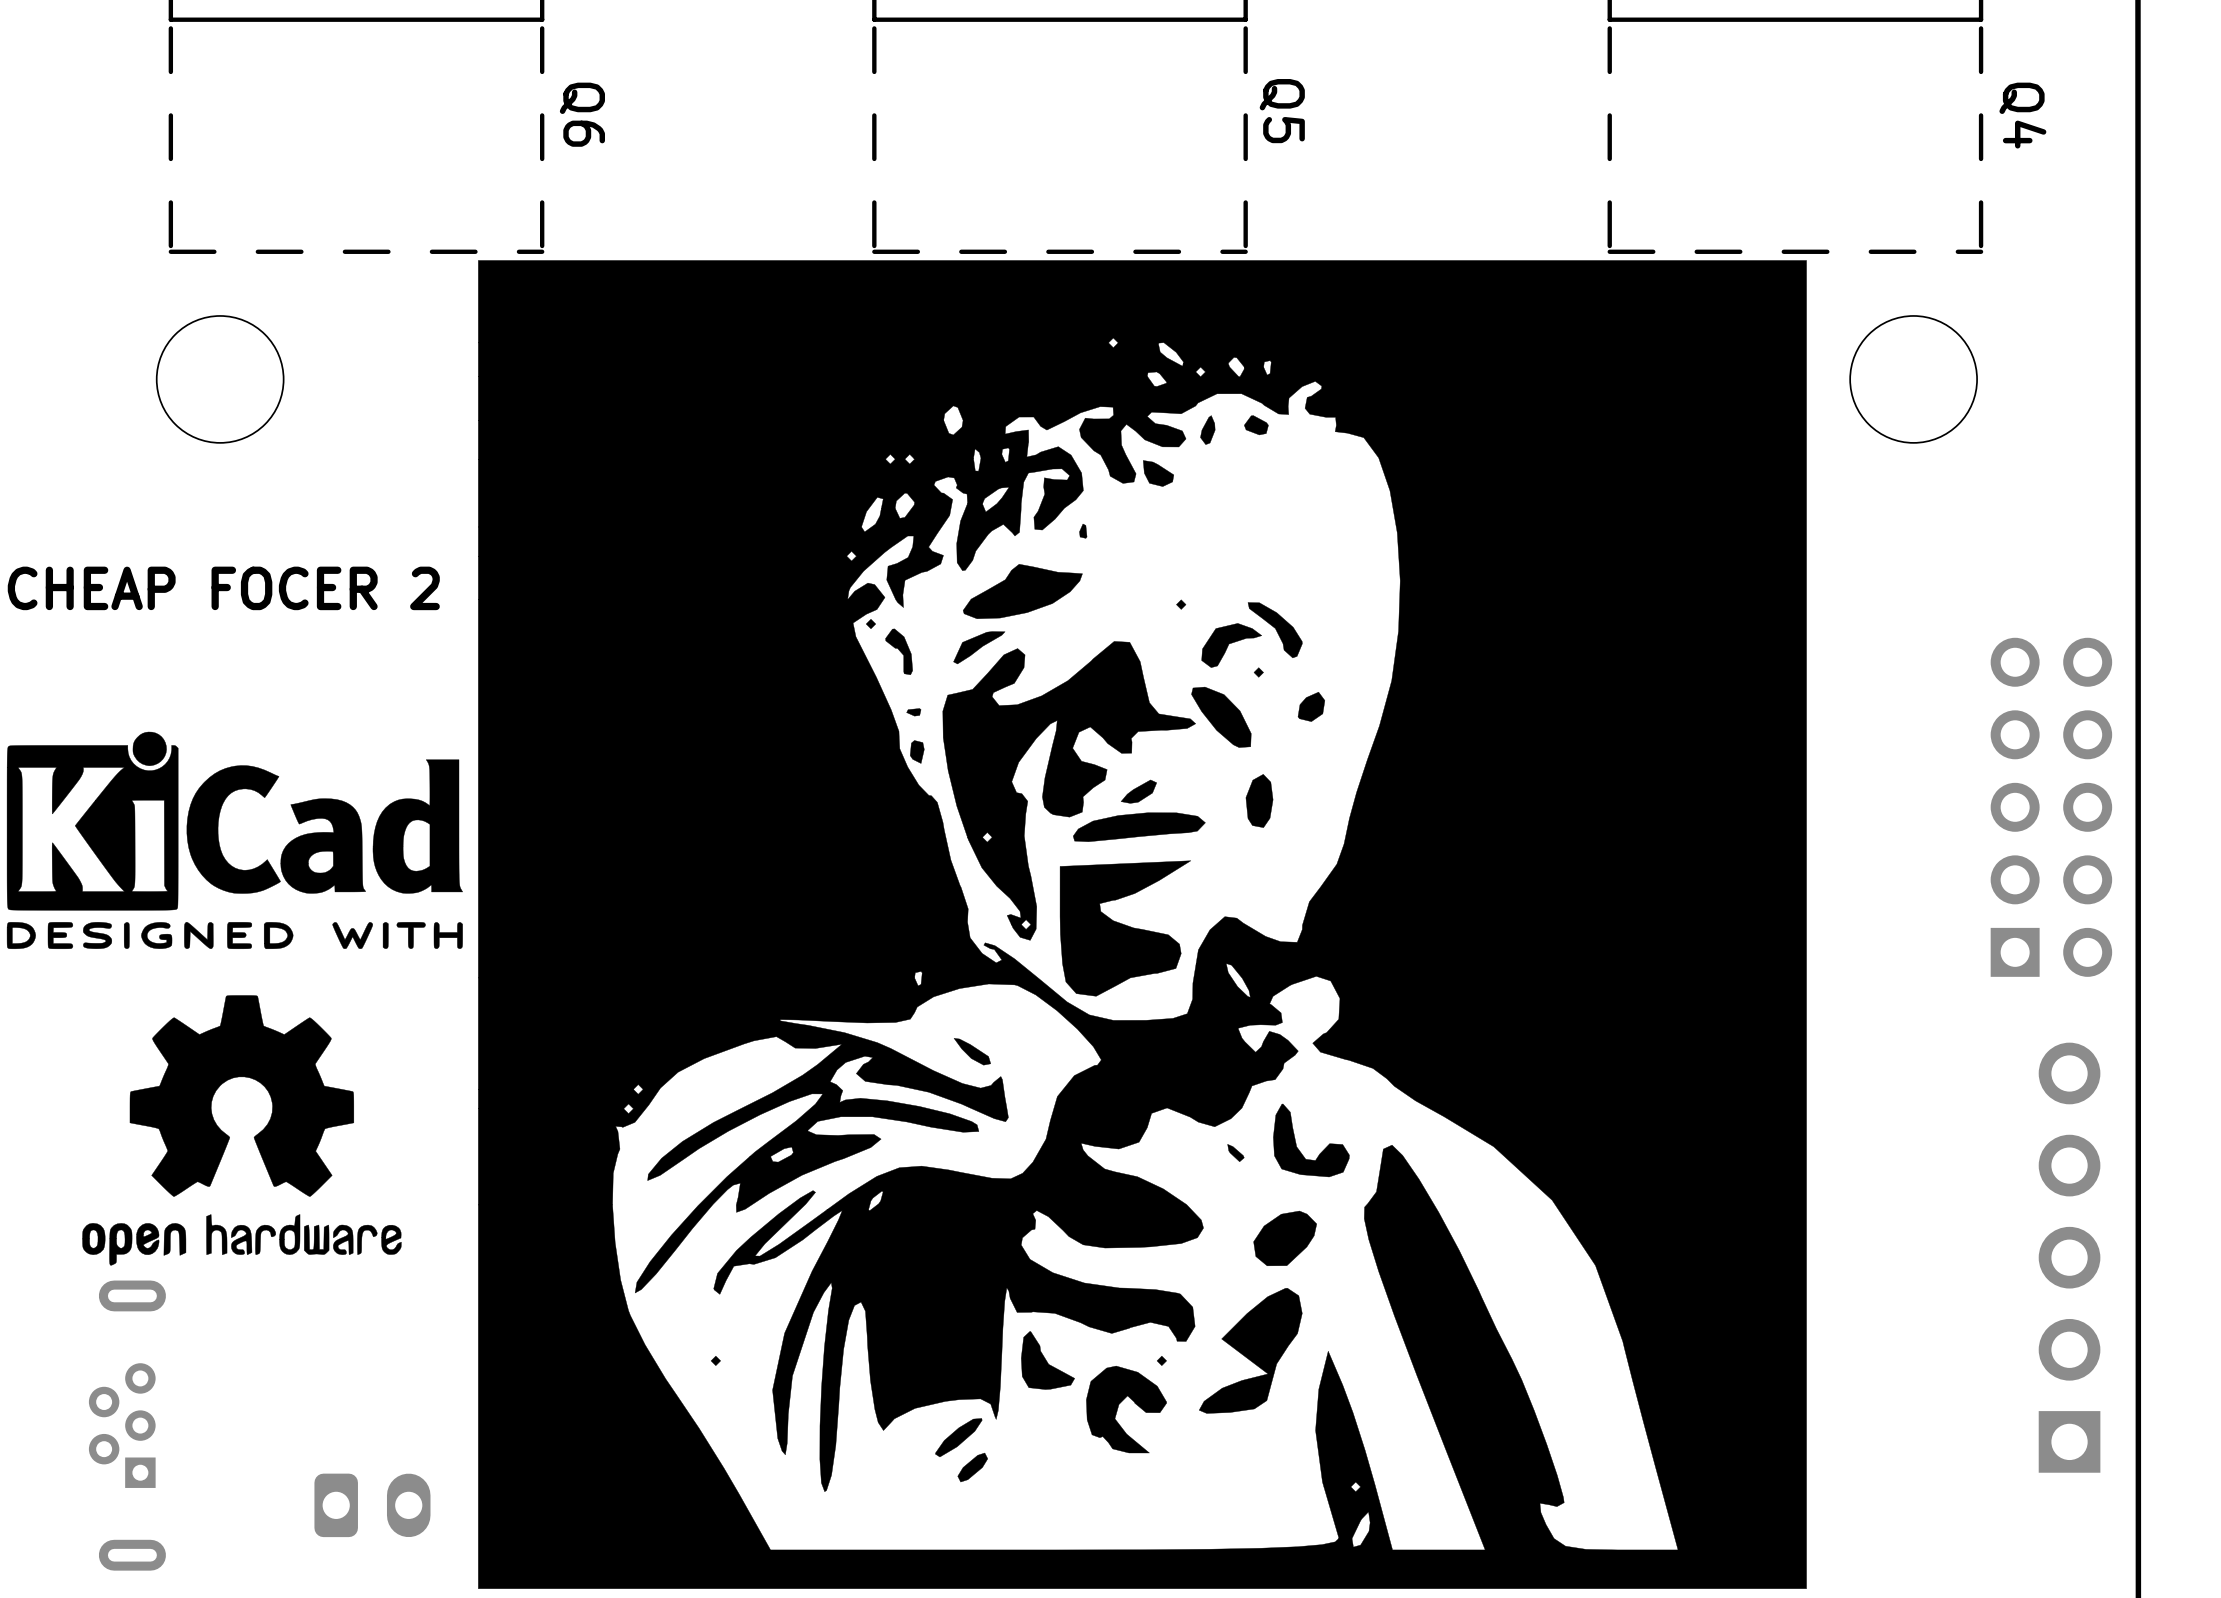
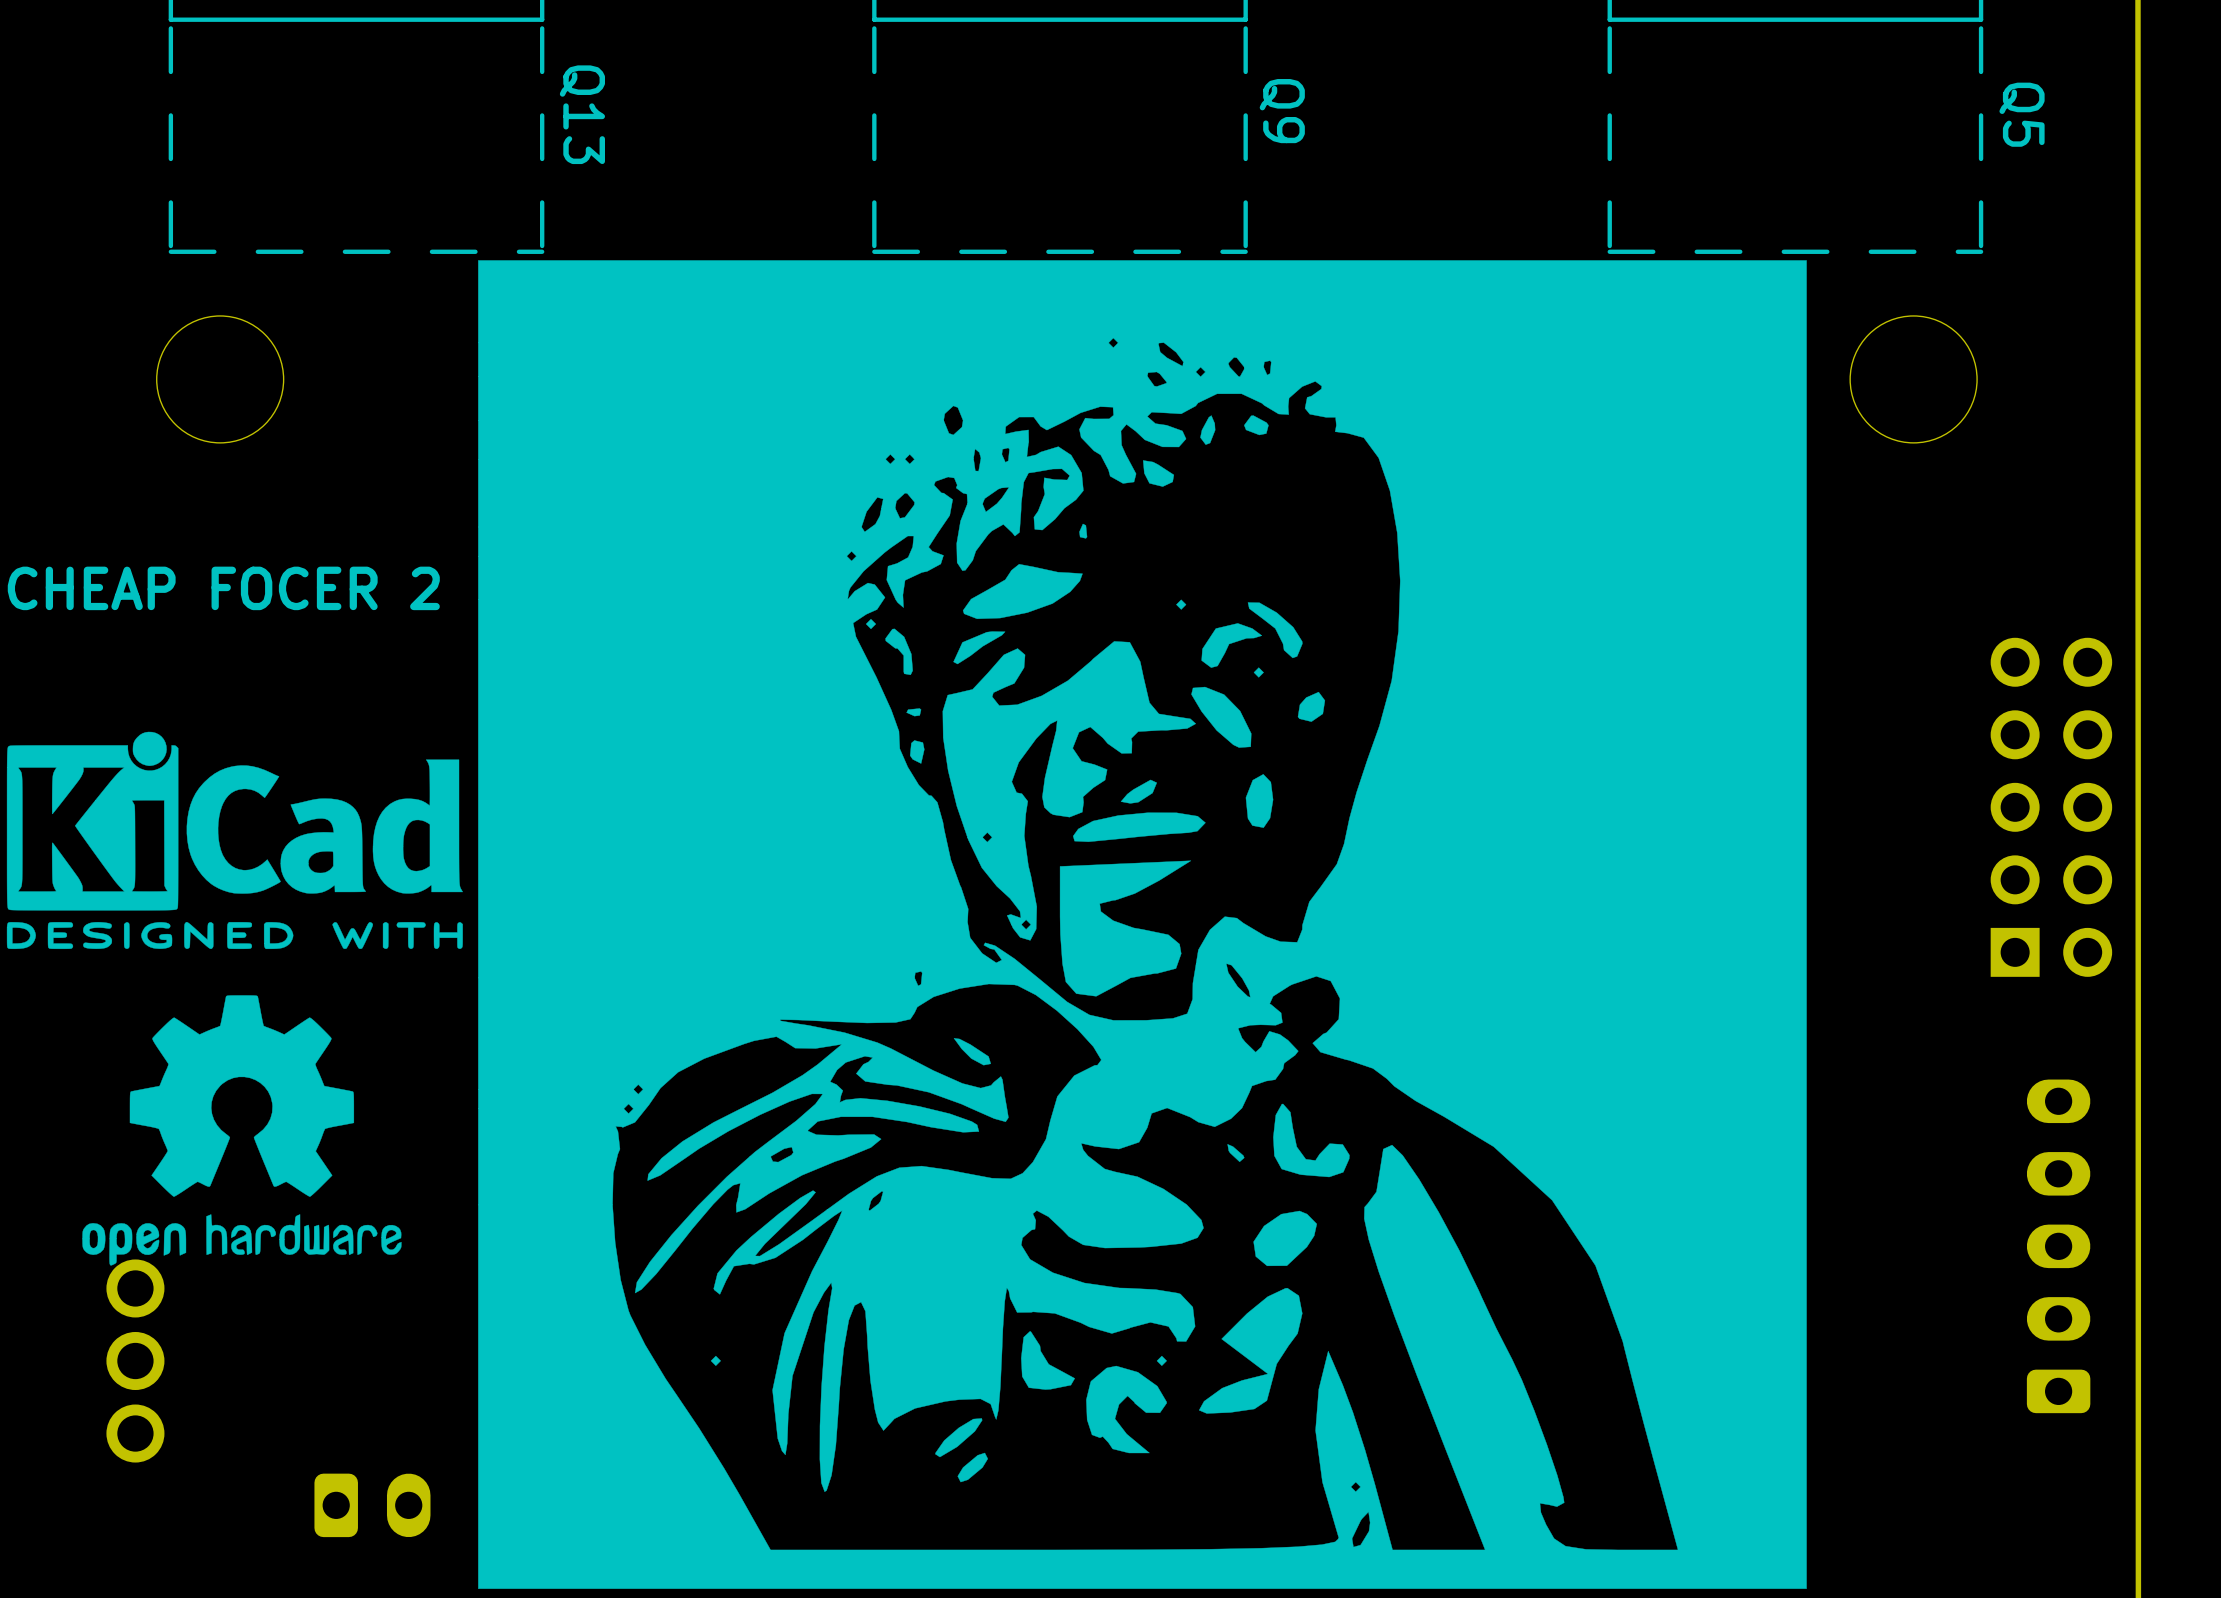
Q5 name: Q5 (1282, 111) -> Q9 (1282, 111)
Q6 name: Q6 (582, 114) -> Q13 (582, 114)
Q4 name: Q4 (2022, 115) -> Q5 (2022, 114)
part footprint: [2038, 1042, 2101, 1473] -> [2026, 1079, 2091, 1414]
part: none -> (135, 1361)
part: (127, 1425) -> none

